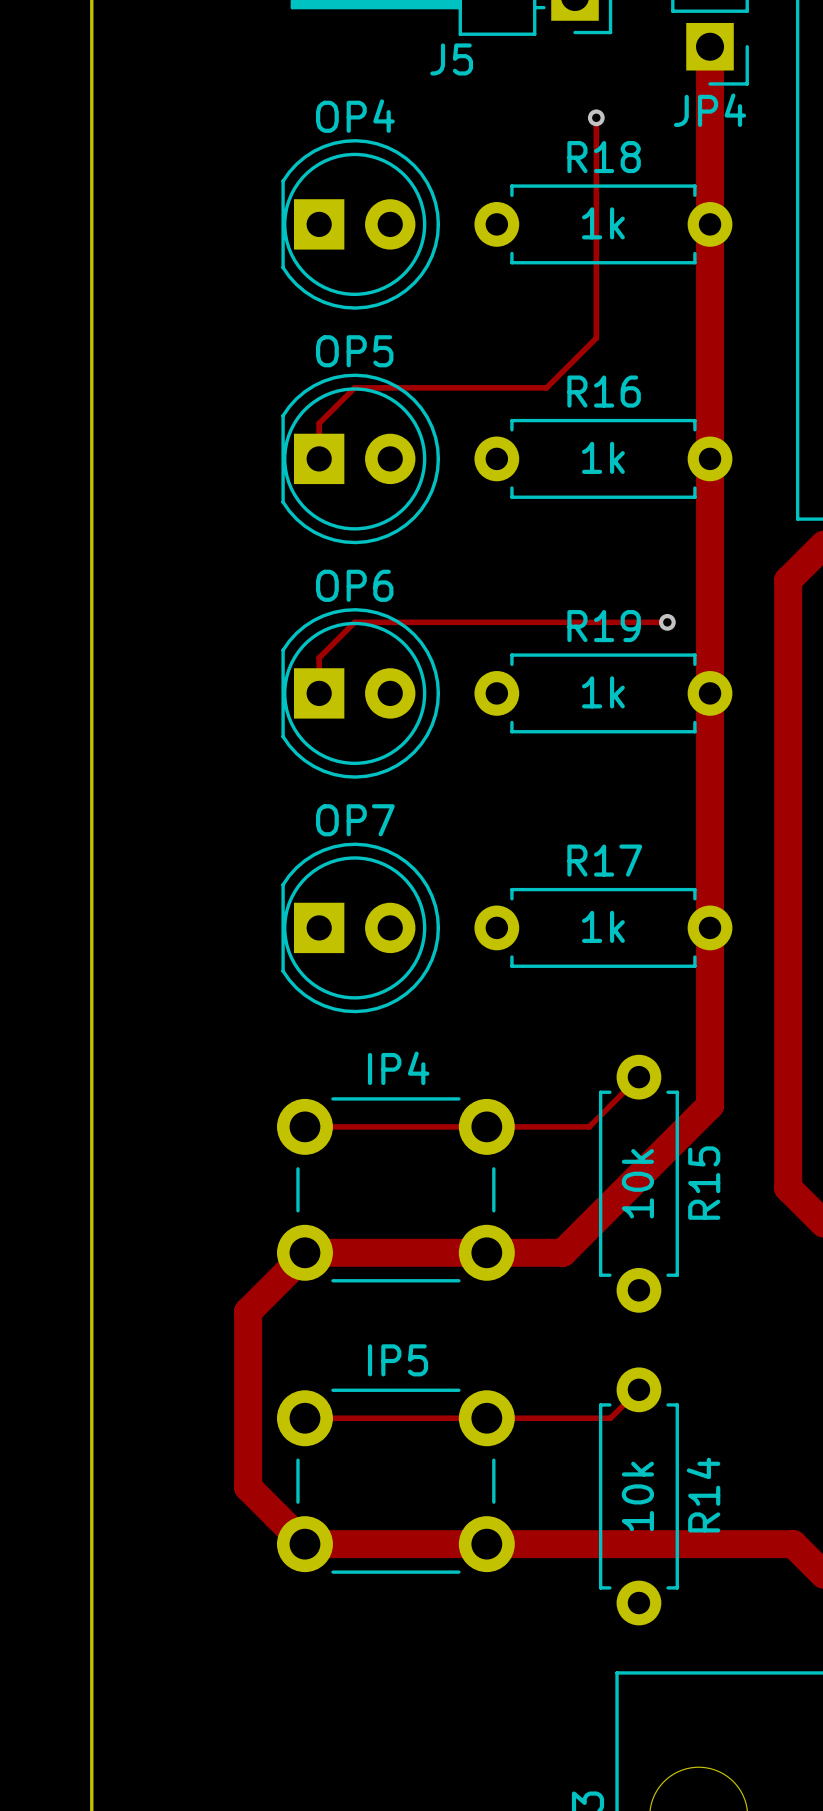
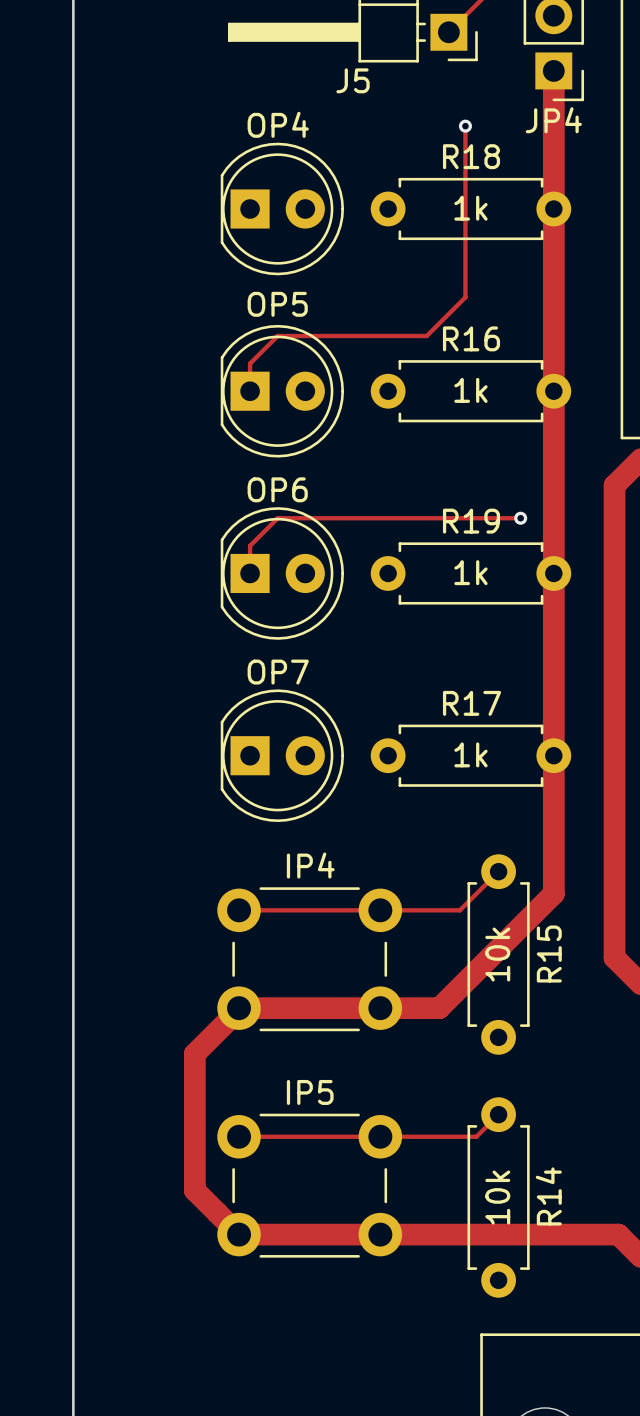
OP5 name: none -> OP5 (277, 304)
OP5 value: OP5 (354, 351) -> none
IP4 value: IP4 (398, 1068) -> none
IP4 name: none -> IP4 (310, 865)
IP5 value: IP5 (398, 1360) -> none
IP5 name: none -> IP5 (310, 1092)

